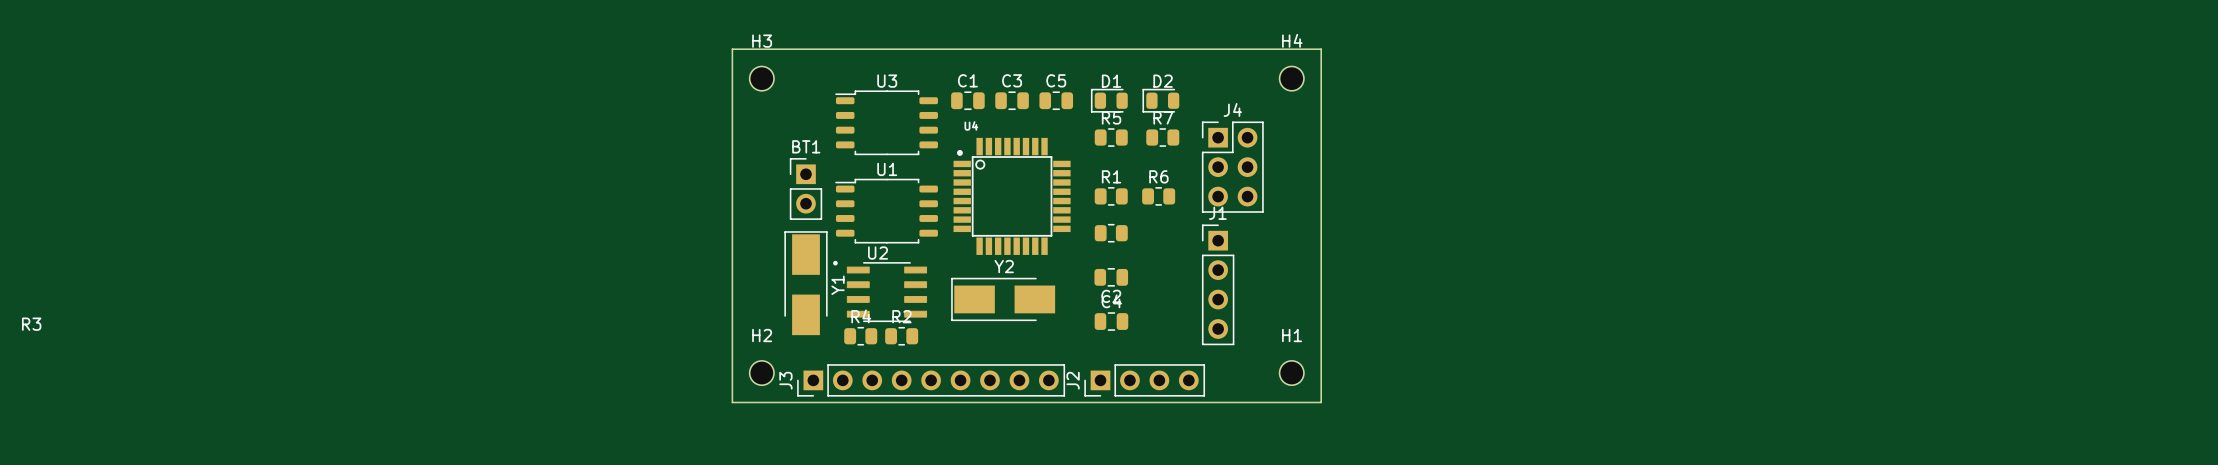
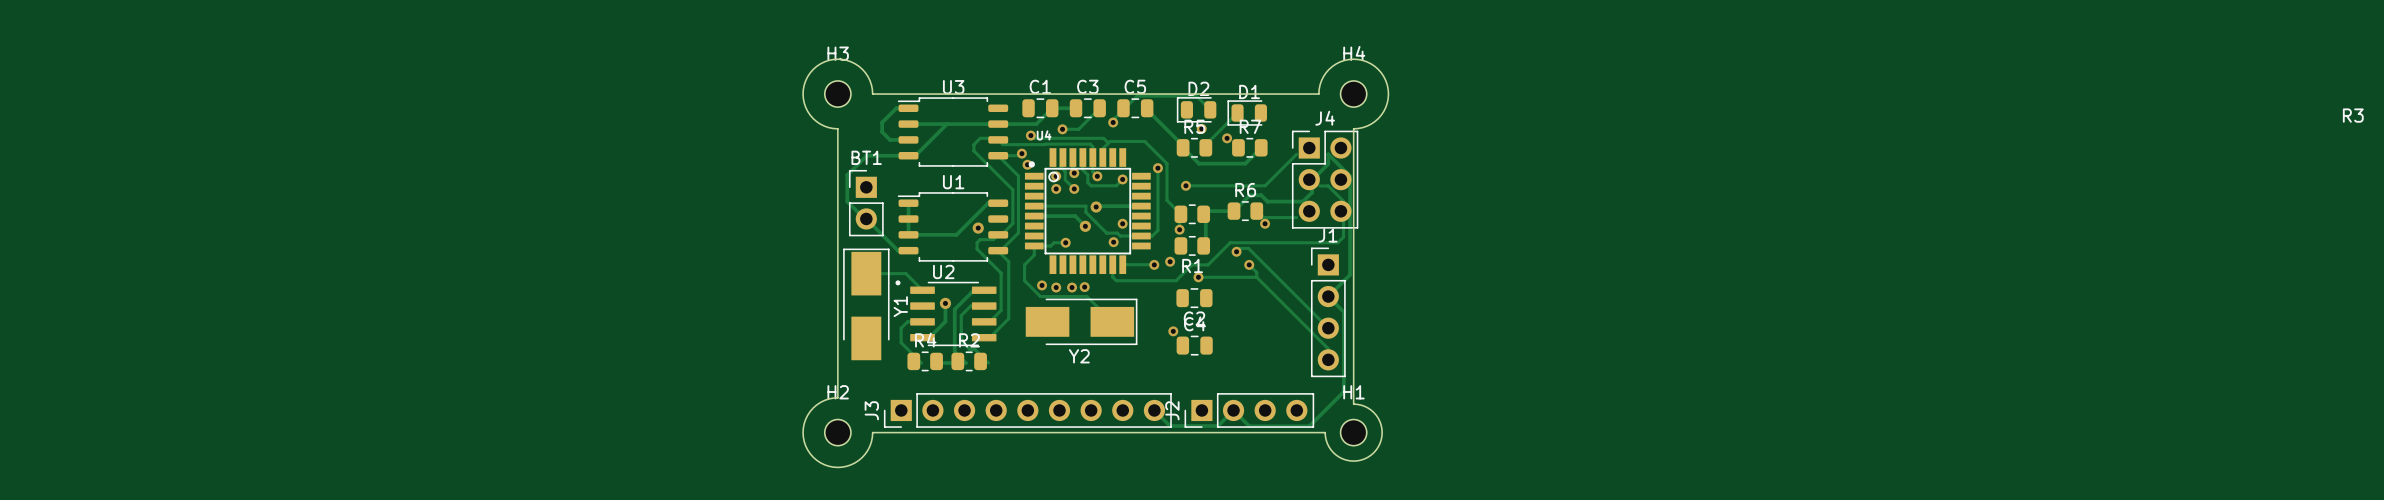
H3 position: (761, 78) -> (837, 94)
H4 position: (1291, 78) -> (1353, 94)
track: none -> (908, 108) (896, 108) (882, 122) (882, 131) (890, 139) (908, 139)
track: none -> (1076, 108) (1052, 108) (1036, 124) (908, 124)
track: none -> (1099, 108) (1078, 129) (1062, 129)
track: none -> (1147, 108) (1198, 163) (1245, 163) (1261, 147)
D1 position: (1109, 100) -> (1247, 113)
D2 position: (1160, 100) -> (1196, 109)
track: none -> (1210, 109) (1196, 96) (1137, 96) (1113, 120) (1113, 122)
track: none -> (1237, 113) (1205, 144) (1205, 147)
via: none -> (1113, 122)
track: none -> (947, 124) (915, 155) (866, 155) (847, 175) (847, 201) (898, 250) (912, 250)
via: none -> (1201, 128)
via: none -> (1062, 129)
track: none -> (1030, 135) (1033, 138) (1103, 138) (1108, 143)
via: none -> (1030, 135)
via: none -> (1227, 138)
track: none -> (1018, 144) (1090, 144) (1092, 146) (1092, 171) (1097, 176)
track: none -> (1018, 144) (1002, 144) (996, 138) (980, 138) (973, 144) (973, 150) (1012, 189) (1012, 223) (1001, 234) (998, 234) (993, 239) (980, 239) (977, 242) (977, 249) (1001, 273) (1001, 310) (989, 321) (984, 321)
track: none -> (1021, 153) (1019, 155) (998, 155) (1018, 175) (1018, 232) (1000, 250) (998, 250) (1008, 261) (1008, 318) (989, 337) (984, 337)
via: none -> (1021, 153)
track: none -> (1296, 154) (1265, 185) (1185, 185)
track: none -> (1082, 157) (1082, 169) (1087, 174) (1087, 182) (1091, 185) (1116, 185) (1122, 179)
track: none -> (1102, 157) (1102, 148) (1110, 141) (1144, 141) (1166, 163) (1166, 200) (1180, 214) (1179, 229)
via: none -> (1027, 164)
track: none -> (1060, 166) (1065, 171) (1065, 179) (1074, 188)
track: none -> (1157, 168) (1157, 230) (1152, 236) (1120, 236) (1117, 233) (1106, 233) (1085, 212) (1085, 206) (1034, 206)
via: none -> (1157, 168)
via: none -> (1074, 173)
via: none -> (1056, 176)
via: none -> (1097, 176)
via: none -> (1122, 179)
via: none -> (1185, 185)
track: none -> (1319, 185) (1328, 185) (1343, 201) (1343, 237) (1337, 242) (1230, 242) (1208, 264) (1191, 264) (1176, 280) (1116, 280) (1112, 277) (1112, 264)
via: none -> (1056, 188)
via: none -> (1074, 188)
R1 name position: R1 (1111, 176) -> R1 (1192, 266)
track: none -> (908, 203) (908, 234) (956, 234) (988, 203) (998, 203)
track: none -> (1141, 206) (1096, 207)
via: none -> (1096, 207)
R1 position: (1111, 196) -> (1192, 245)
track: none -> (1034, 216) (1075, 216) (1085, 226)
track: none -> (1263, 217) (1296, 217)
via: none -> (1122, 223)
via: none -> (1265, 223)
via: none -> (1085, 226)
via: none -> (978, 228)
via: none -> (1179, 229)
track: none -> (1065, 242) (1054, 242) (1050, 245) (1034, 245) (1034, 255) (1024, 264) (1024, 280) (1040, 296) (1087, 296) (1112, 321)
via: none -> (1065, 242)
via: none -> (1113, 242)
R3 position: (1111, 233) -> (1192, 214)
track: none -> (1205, 250) (1205, 216) (1203, 214) (1206, 211) (1234, 211) (1249, 195) (1261, 195) (1267, 201) (1303, 201) (1312, 192) (1312, 180) (1328, 163) (1328, 154) (1350, 176) (1350, 274) (1328, 296) (1343, 312) (1343, 391) (1309, 426) (1249, 426) (1233, 410) (1217, 426) (1170, 426) (1154, 410)
track: none -> (1236, 251) (1236, 248) (1248, 248) (1328, 328)
via: none -> (1236, 251)
via: none -> (1170, 261)
track: none -> (1122, 264) (1154, 264)
via: none -> (1154, 264)
track: none -> (1249, 264) (1256, 272) (1256, 277)
via: none -> (1249, 264)
track: none -> (866, 273) (905, 273) (922, 290)
track: none -> (1198, 277) (1256, 277)
via: none -> (1198, 277)
track: none -> (1256, 277) (1328, 348) (1328, 359)
via: none -> (1042, 285)
via: none -> (1056, 287)
via: none -> (1072, 287)
via: none -> (1084, 287)
track: none -> (984, 290) (973, 290) (954, 309) (954, 352) (965, 363) (944, 363)
track: none -> (945, 303) (945, 321) (929, 337) (922, 337)
via: none -> (945, 303)
track: none -> (984, 306) (970, 306) (961, 315) (961, 340) (970, 349) (975, 349) (988, 363)
J1 position: (1218, 284) -> (1328, 312)
track: none -> (922, 321) (907, 321) (901, 328) (901, 342) (921, 363)
Y2 rotation: 0° (1003, 299) -> 180° (1081, 321)
via: none -> (1173, 331)
R3 name position: R3 (31, 324) -> R3 (2353, 115)
H2 position: (761, 373) -> (837, 432)
H1 position: (1291, 373) -> (1353, 432)
J3 position: (931, 380) -> (1027, 410)
J2 position: (1144, 380) -> (1249, 410)
board edge: (811, 402) (732, 402) (732, 49) (1321, 49) (1321, 402) (1232, 402) -> (872, 432) (871, 441) (865, 453) (855, 462) (842, 467) (828, 466) (816, 460) (807, 450) (803, 437) (804, 423) (810, 411) (820, 402) (837, 397) (837, 128) (824, 126) (813, 118) (805, 107) (803, 94) (804, 85) (810, 72) (820, 63) (833, 59) (851, 61) (862, 69) (870, 80) (872, 94) (1318, 94) (1323, 76) (1336, 63) (1353, 59) (1362, 60) (1374, 66) (1383, 76) (1387, 85) (1388, 98) (1385, 107) (1381, 115) (1371, 124) (1353, 128) (1353, 404) (1367, 407) (1376, 415) (1381, 425) (1381, 436) (1378, 446) (1371, 455) (1353, 461) (1342, 458) (1333, 452) (1327, 443) (1325, 432)

